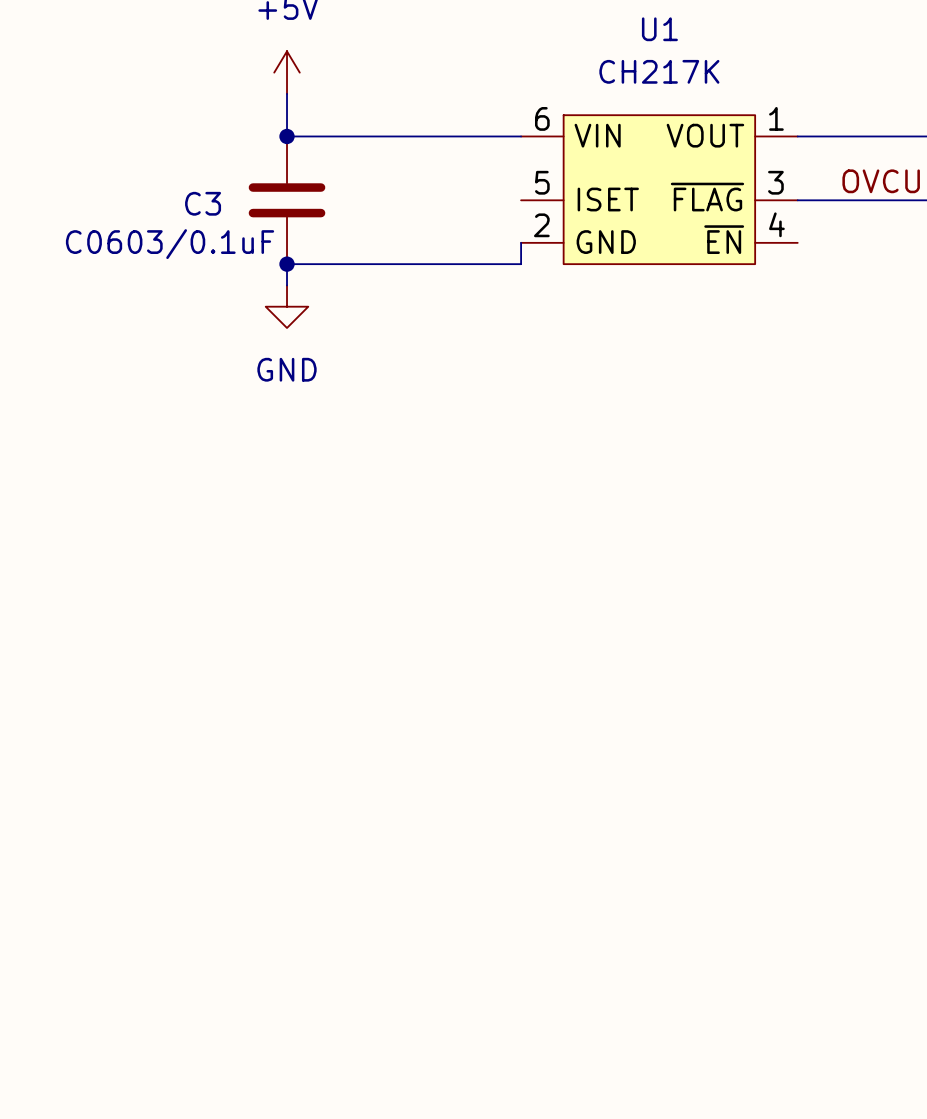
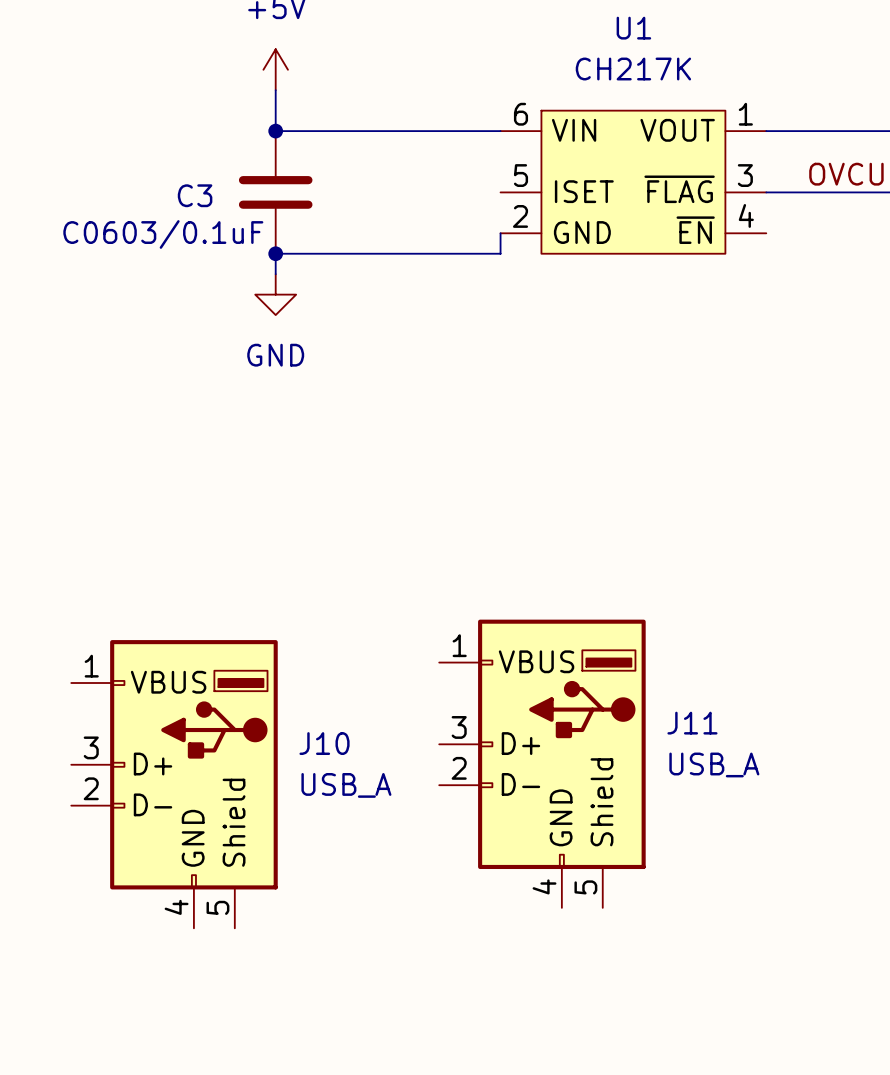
J11: none -> USB_A (542, 763)
J10: none -> USB_A (174, 784)

